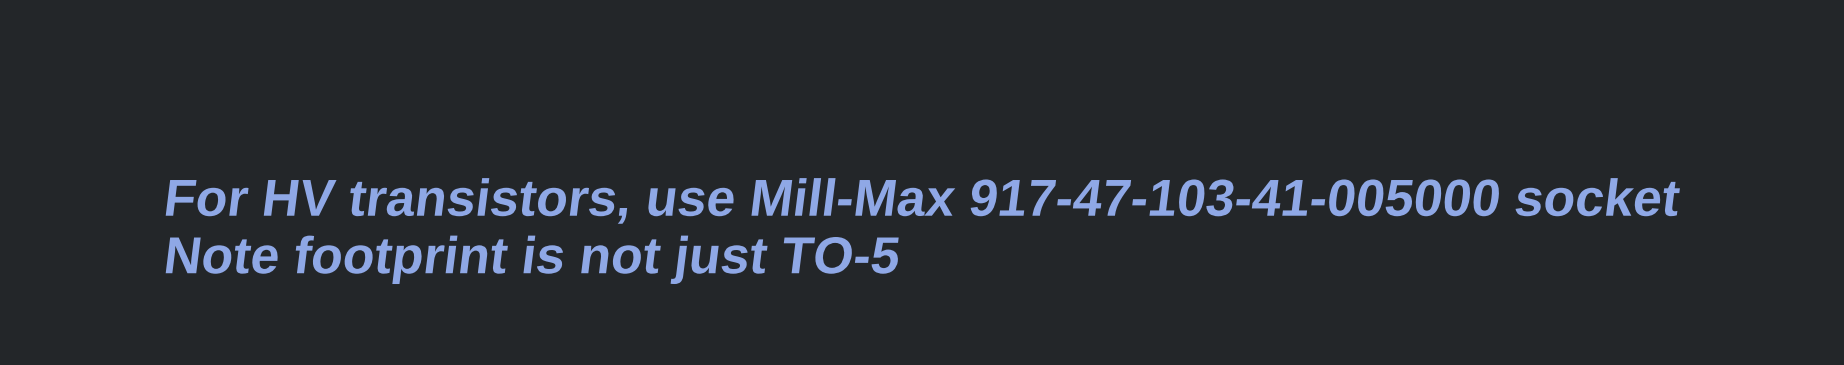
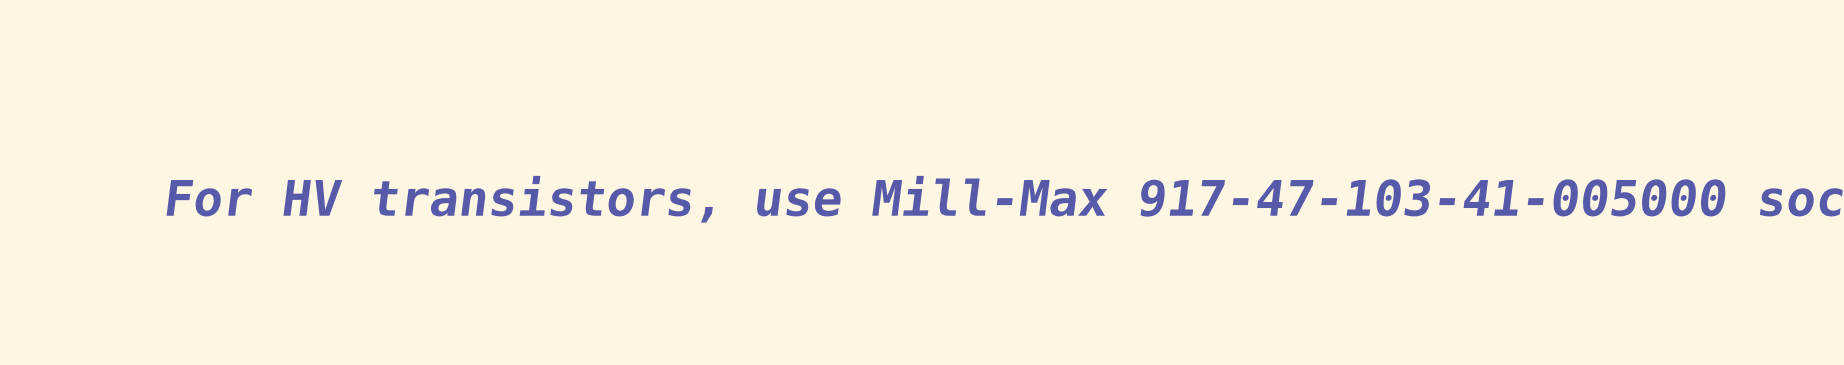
text: Note footprint is not just TO-5 (532, 259) -> none

